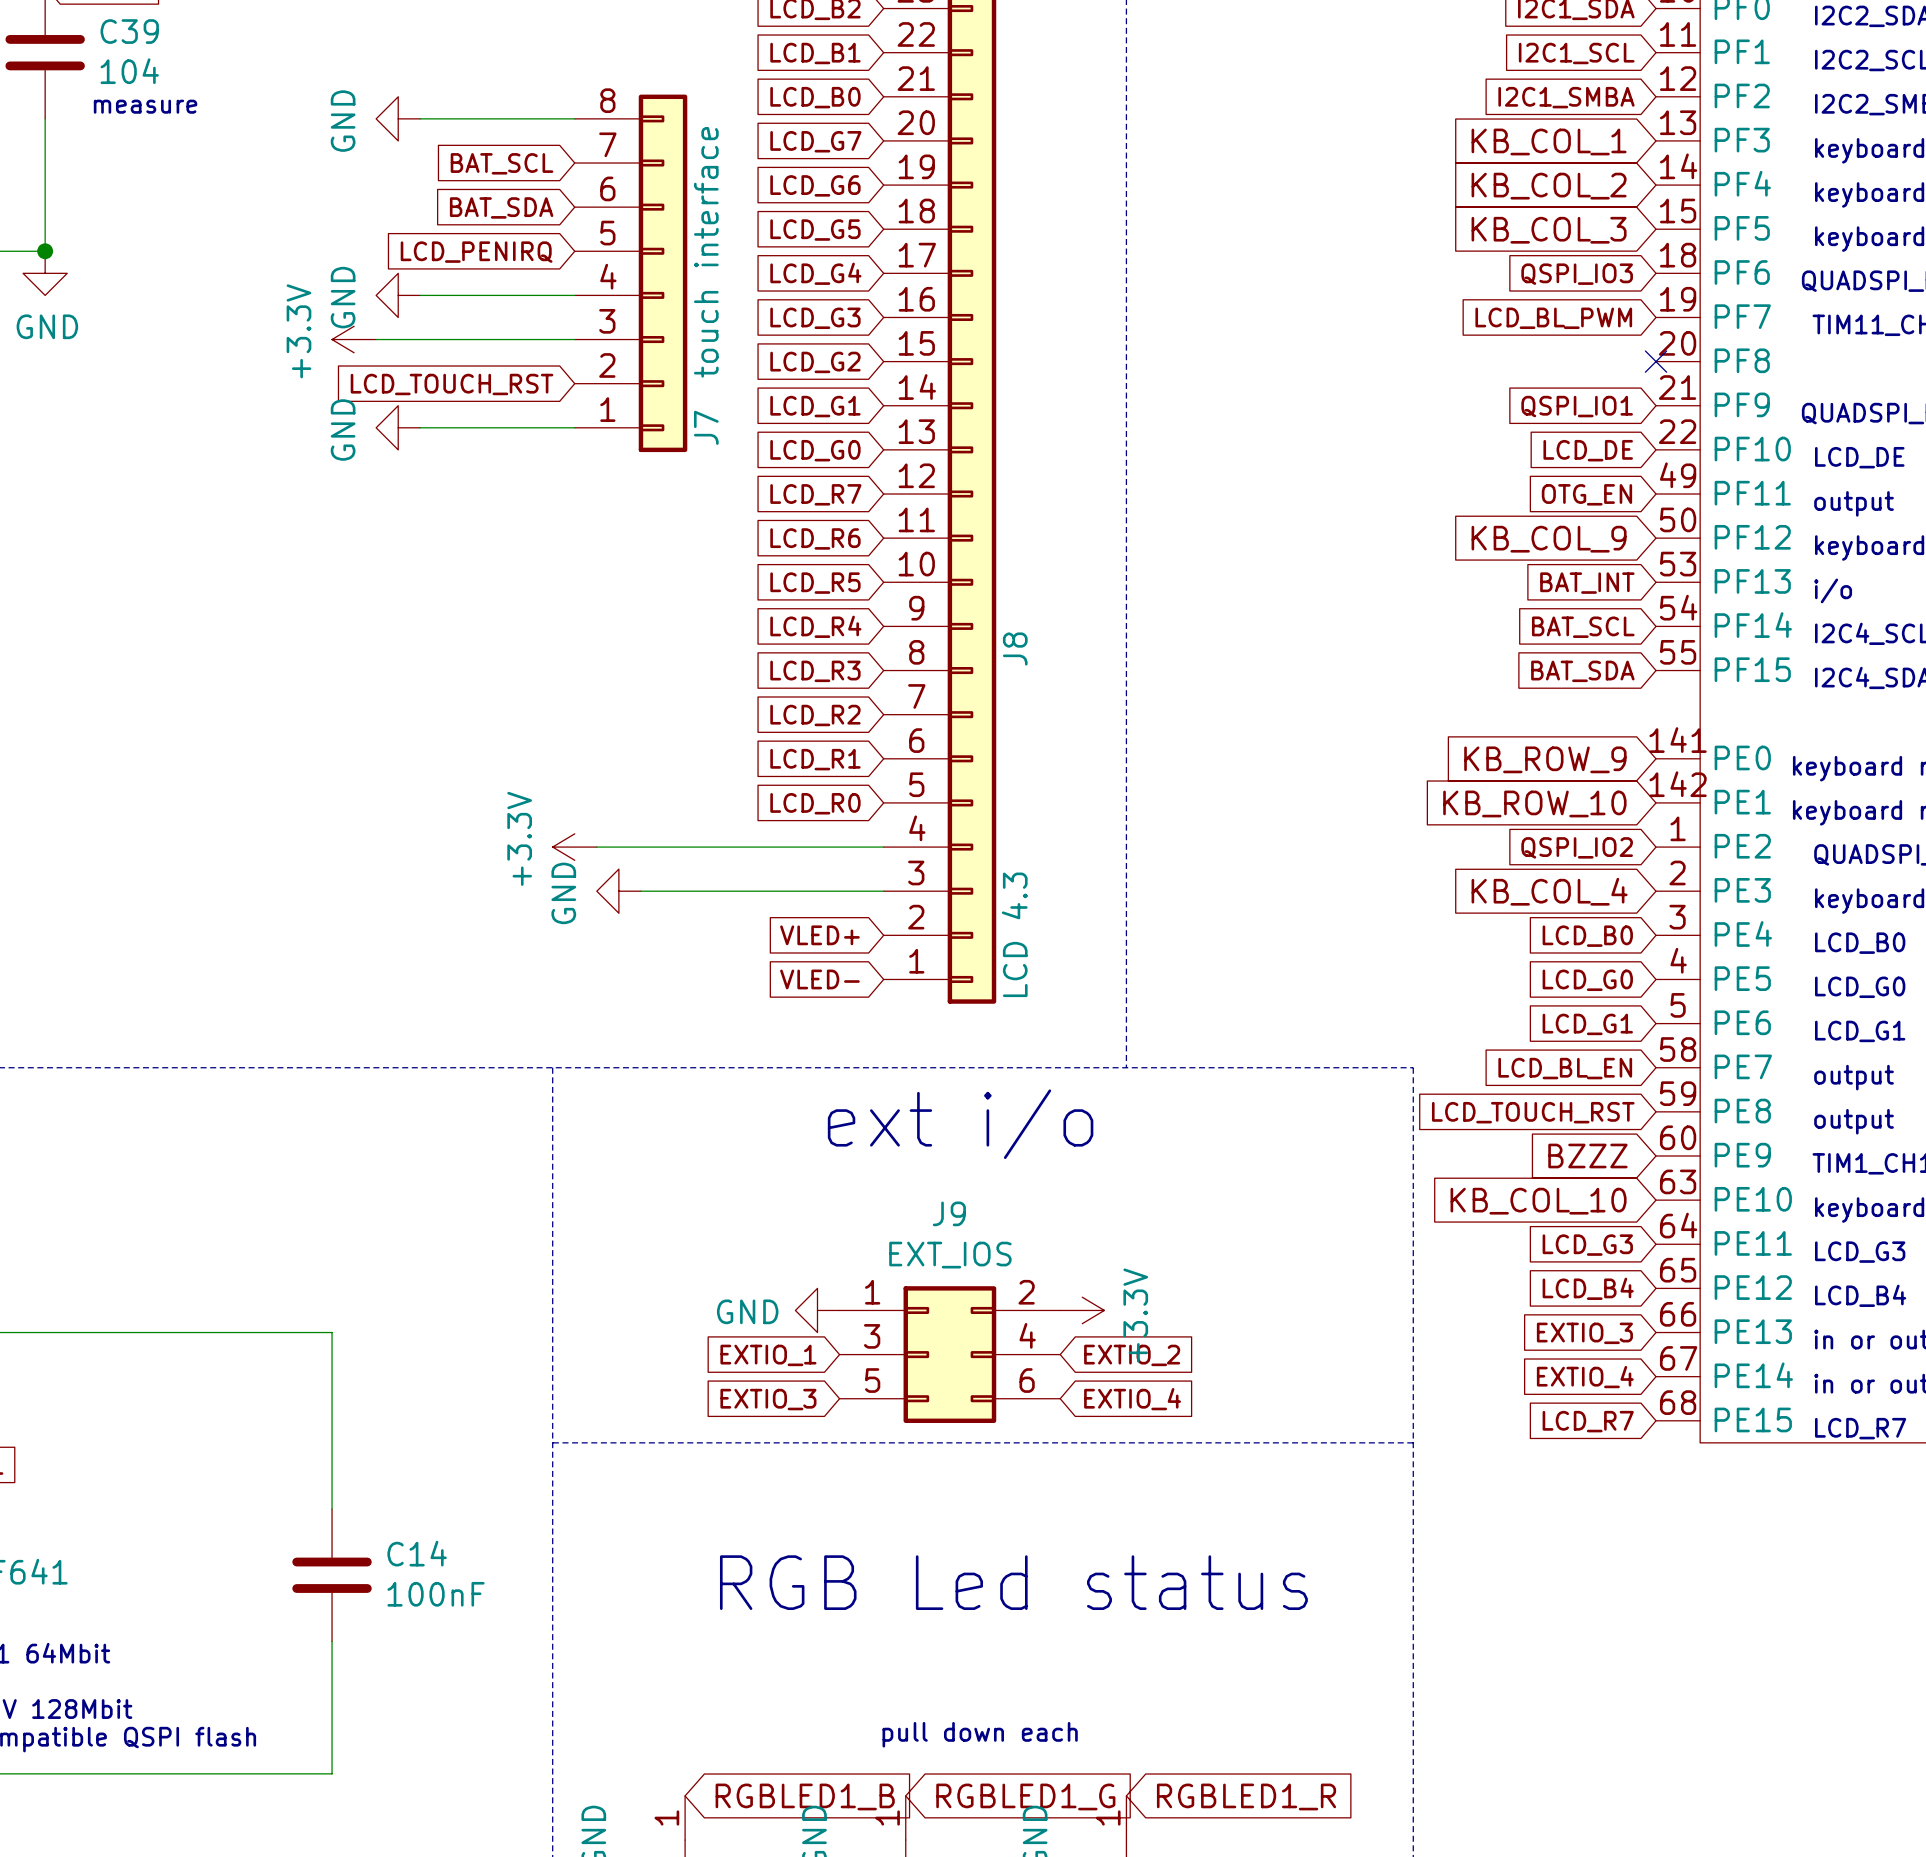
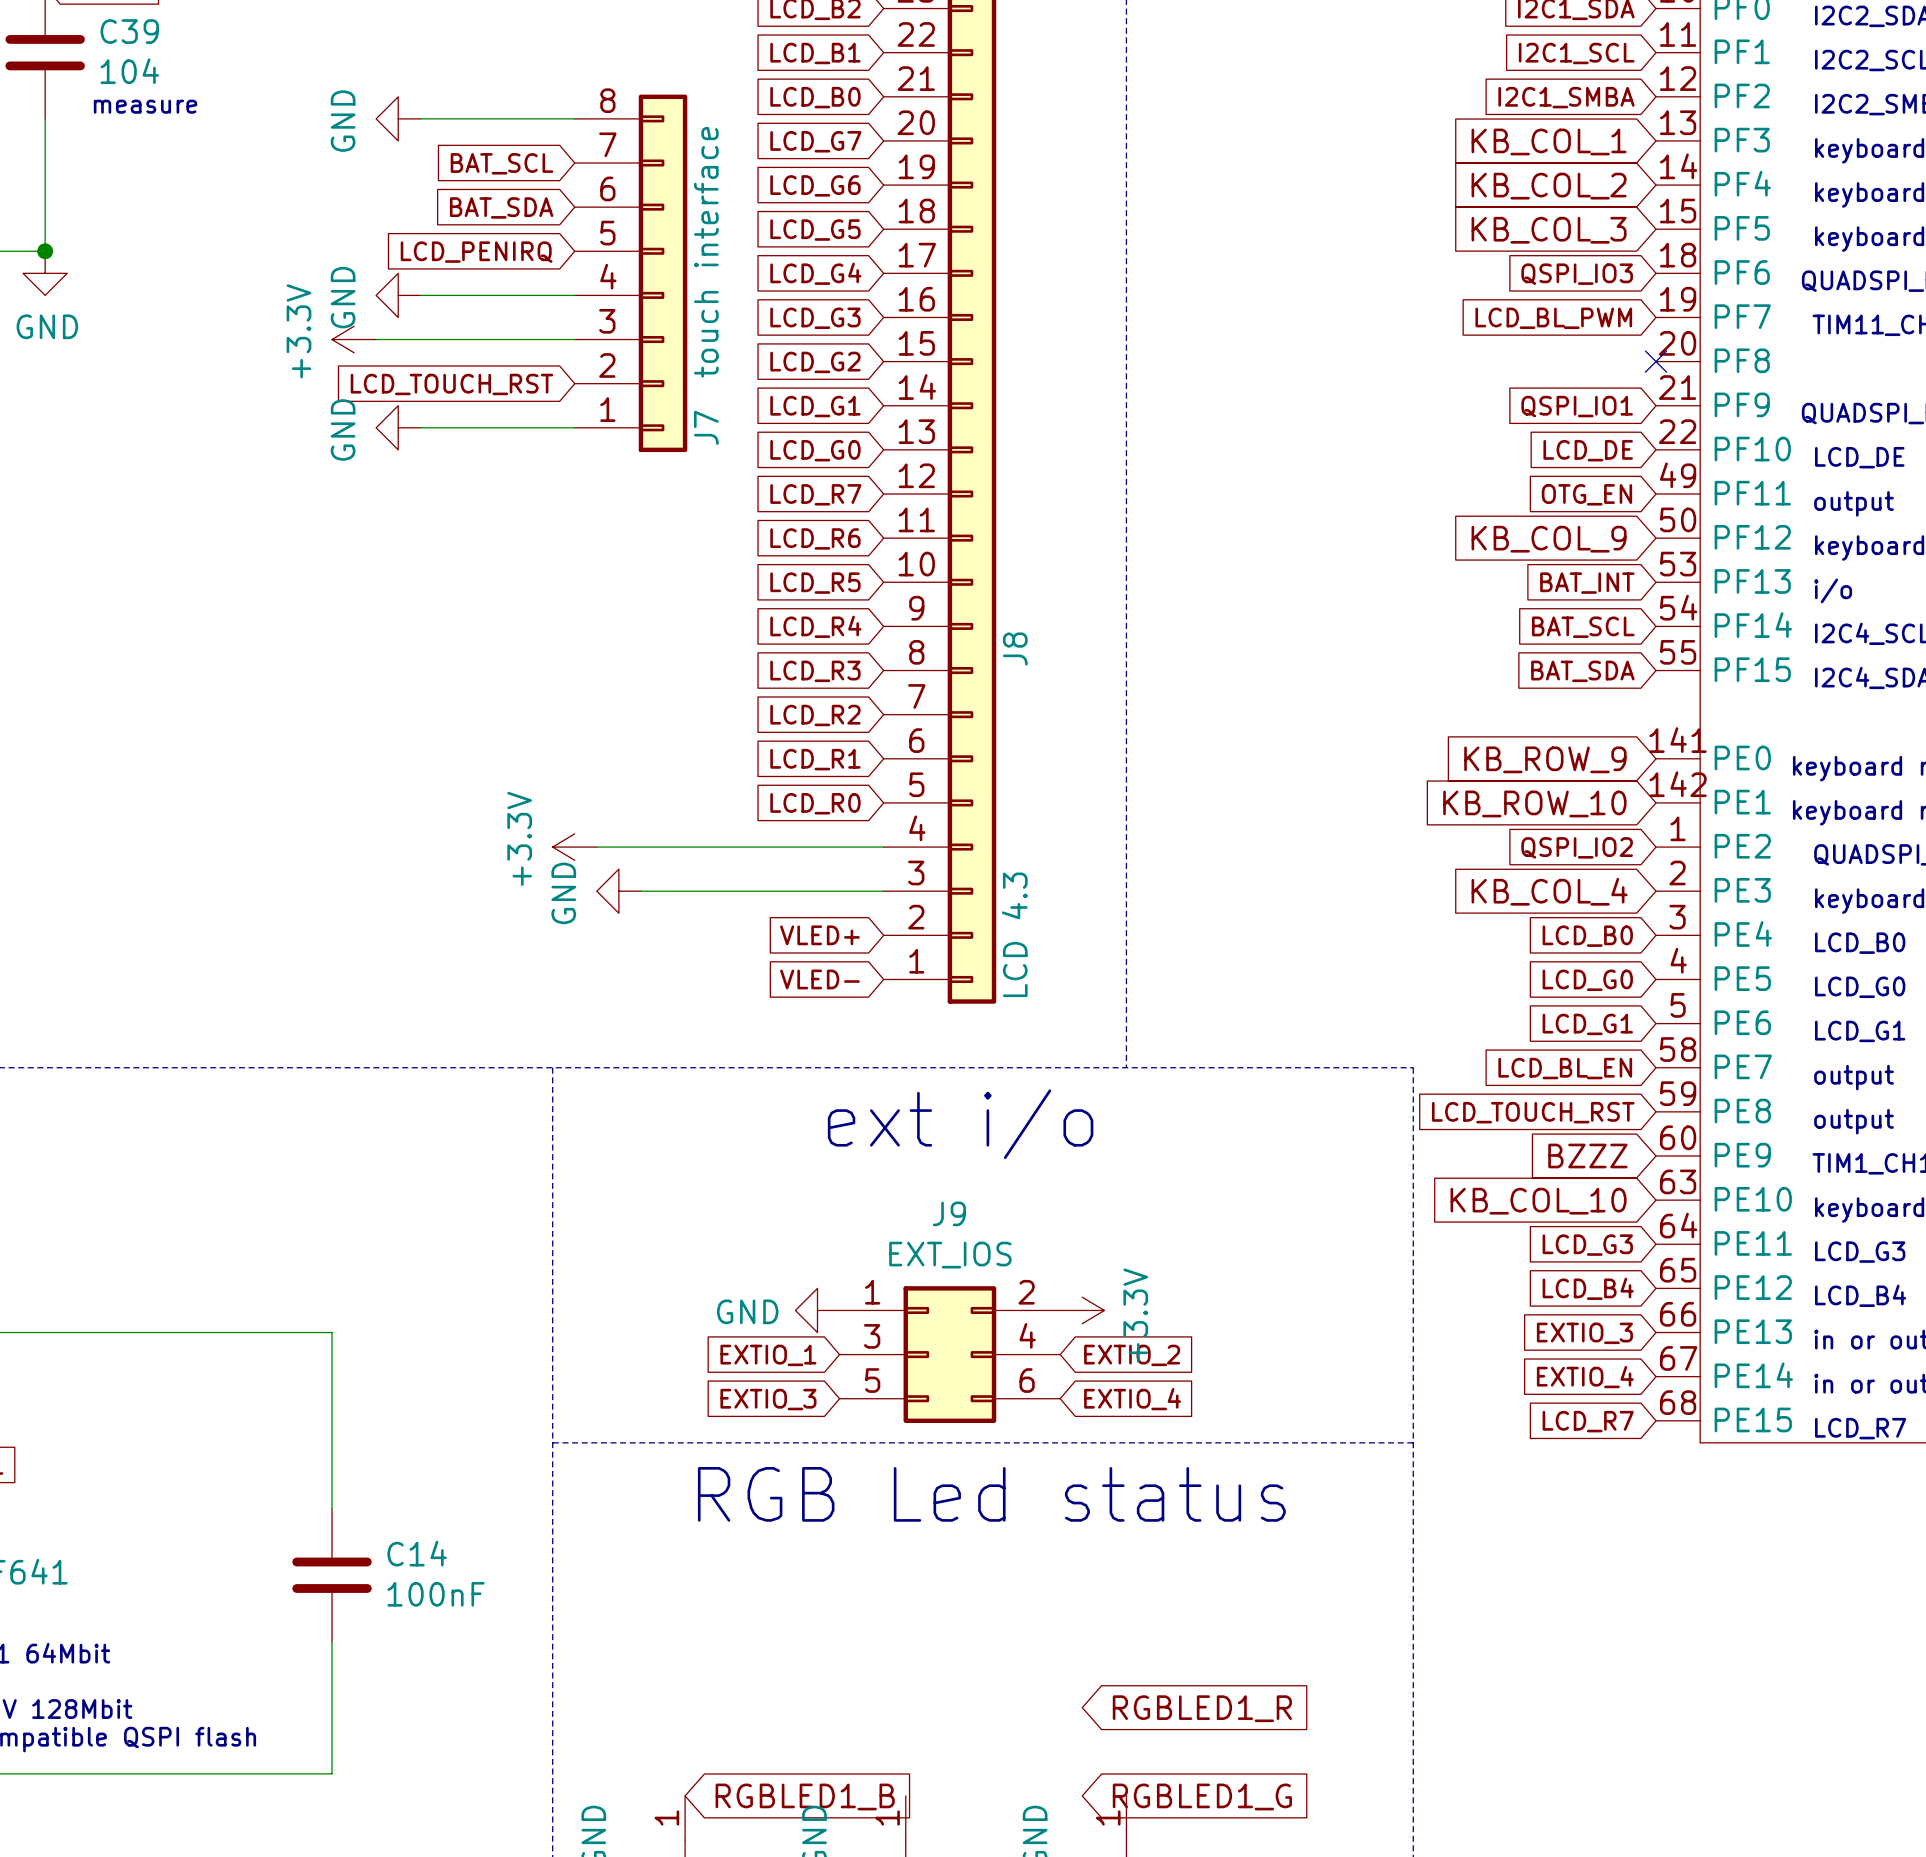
text position: RGB Led status (1013, 1582) -> RGB Led status (991, 1494)
text: pull down each (980, 1734) -> none
global label position: RGBLED1_G (1025, 1796) -> RGBLED1_G (1202, 1796)
global label position: RGBLED1_R (1246, 1796) -> RGBLED1_R (1202, 1708)

